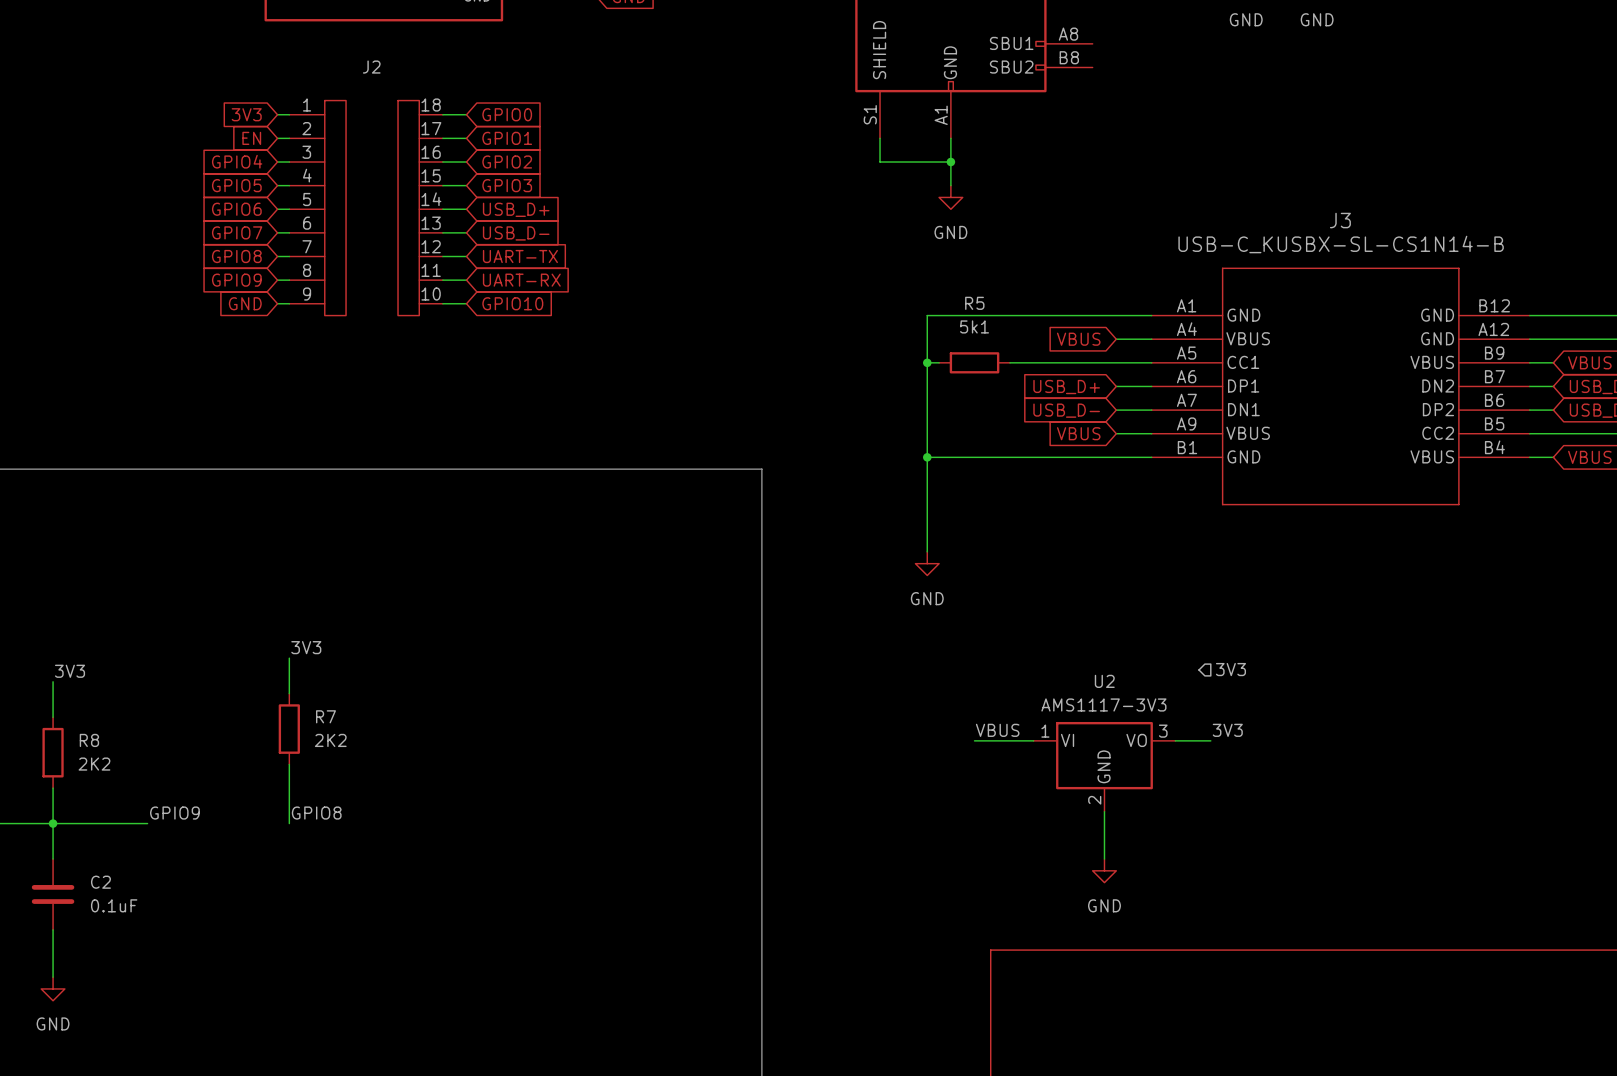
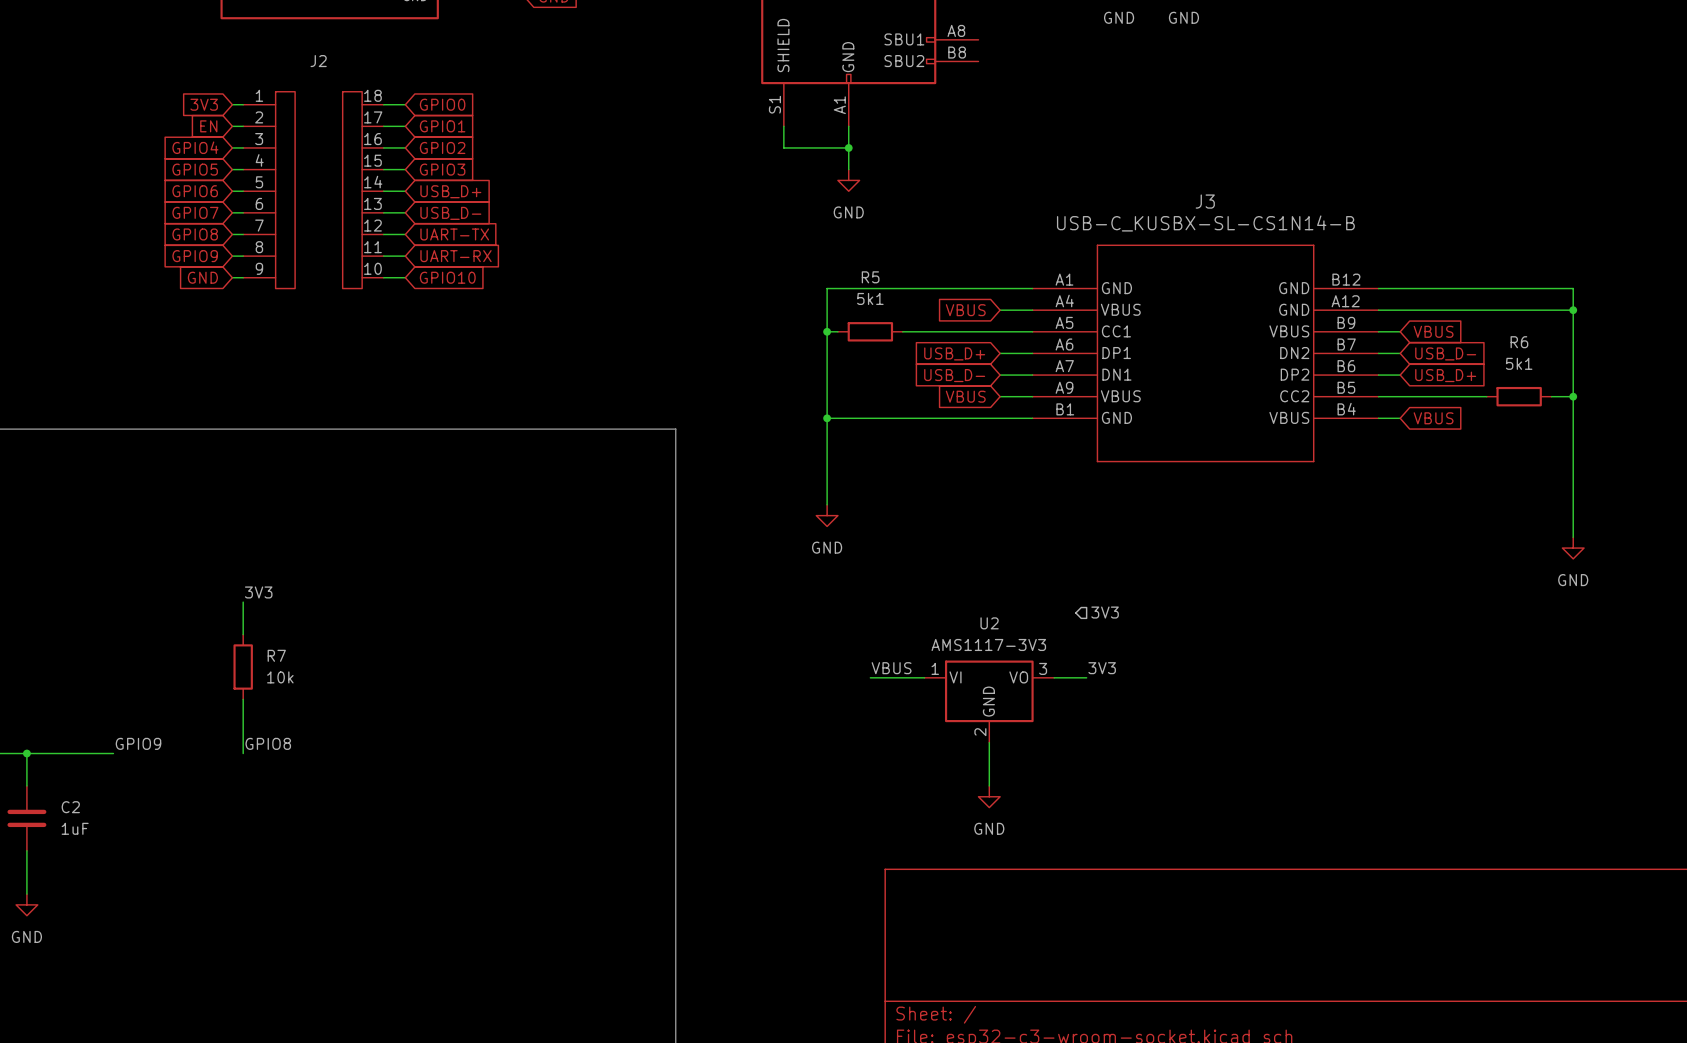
label: 3V3 (70, 671) -> none
wire: (53, 681) (53, 717) -> none
R7 value: 2K2 (330, 740) -> 10k (280, 677)
R8: 2K2 (53, 752) -> none
wire: (53, 788) (53, 823) -> none
C2 value: 0.1uF (114, 905) -> 1uF (75, 828)

